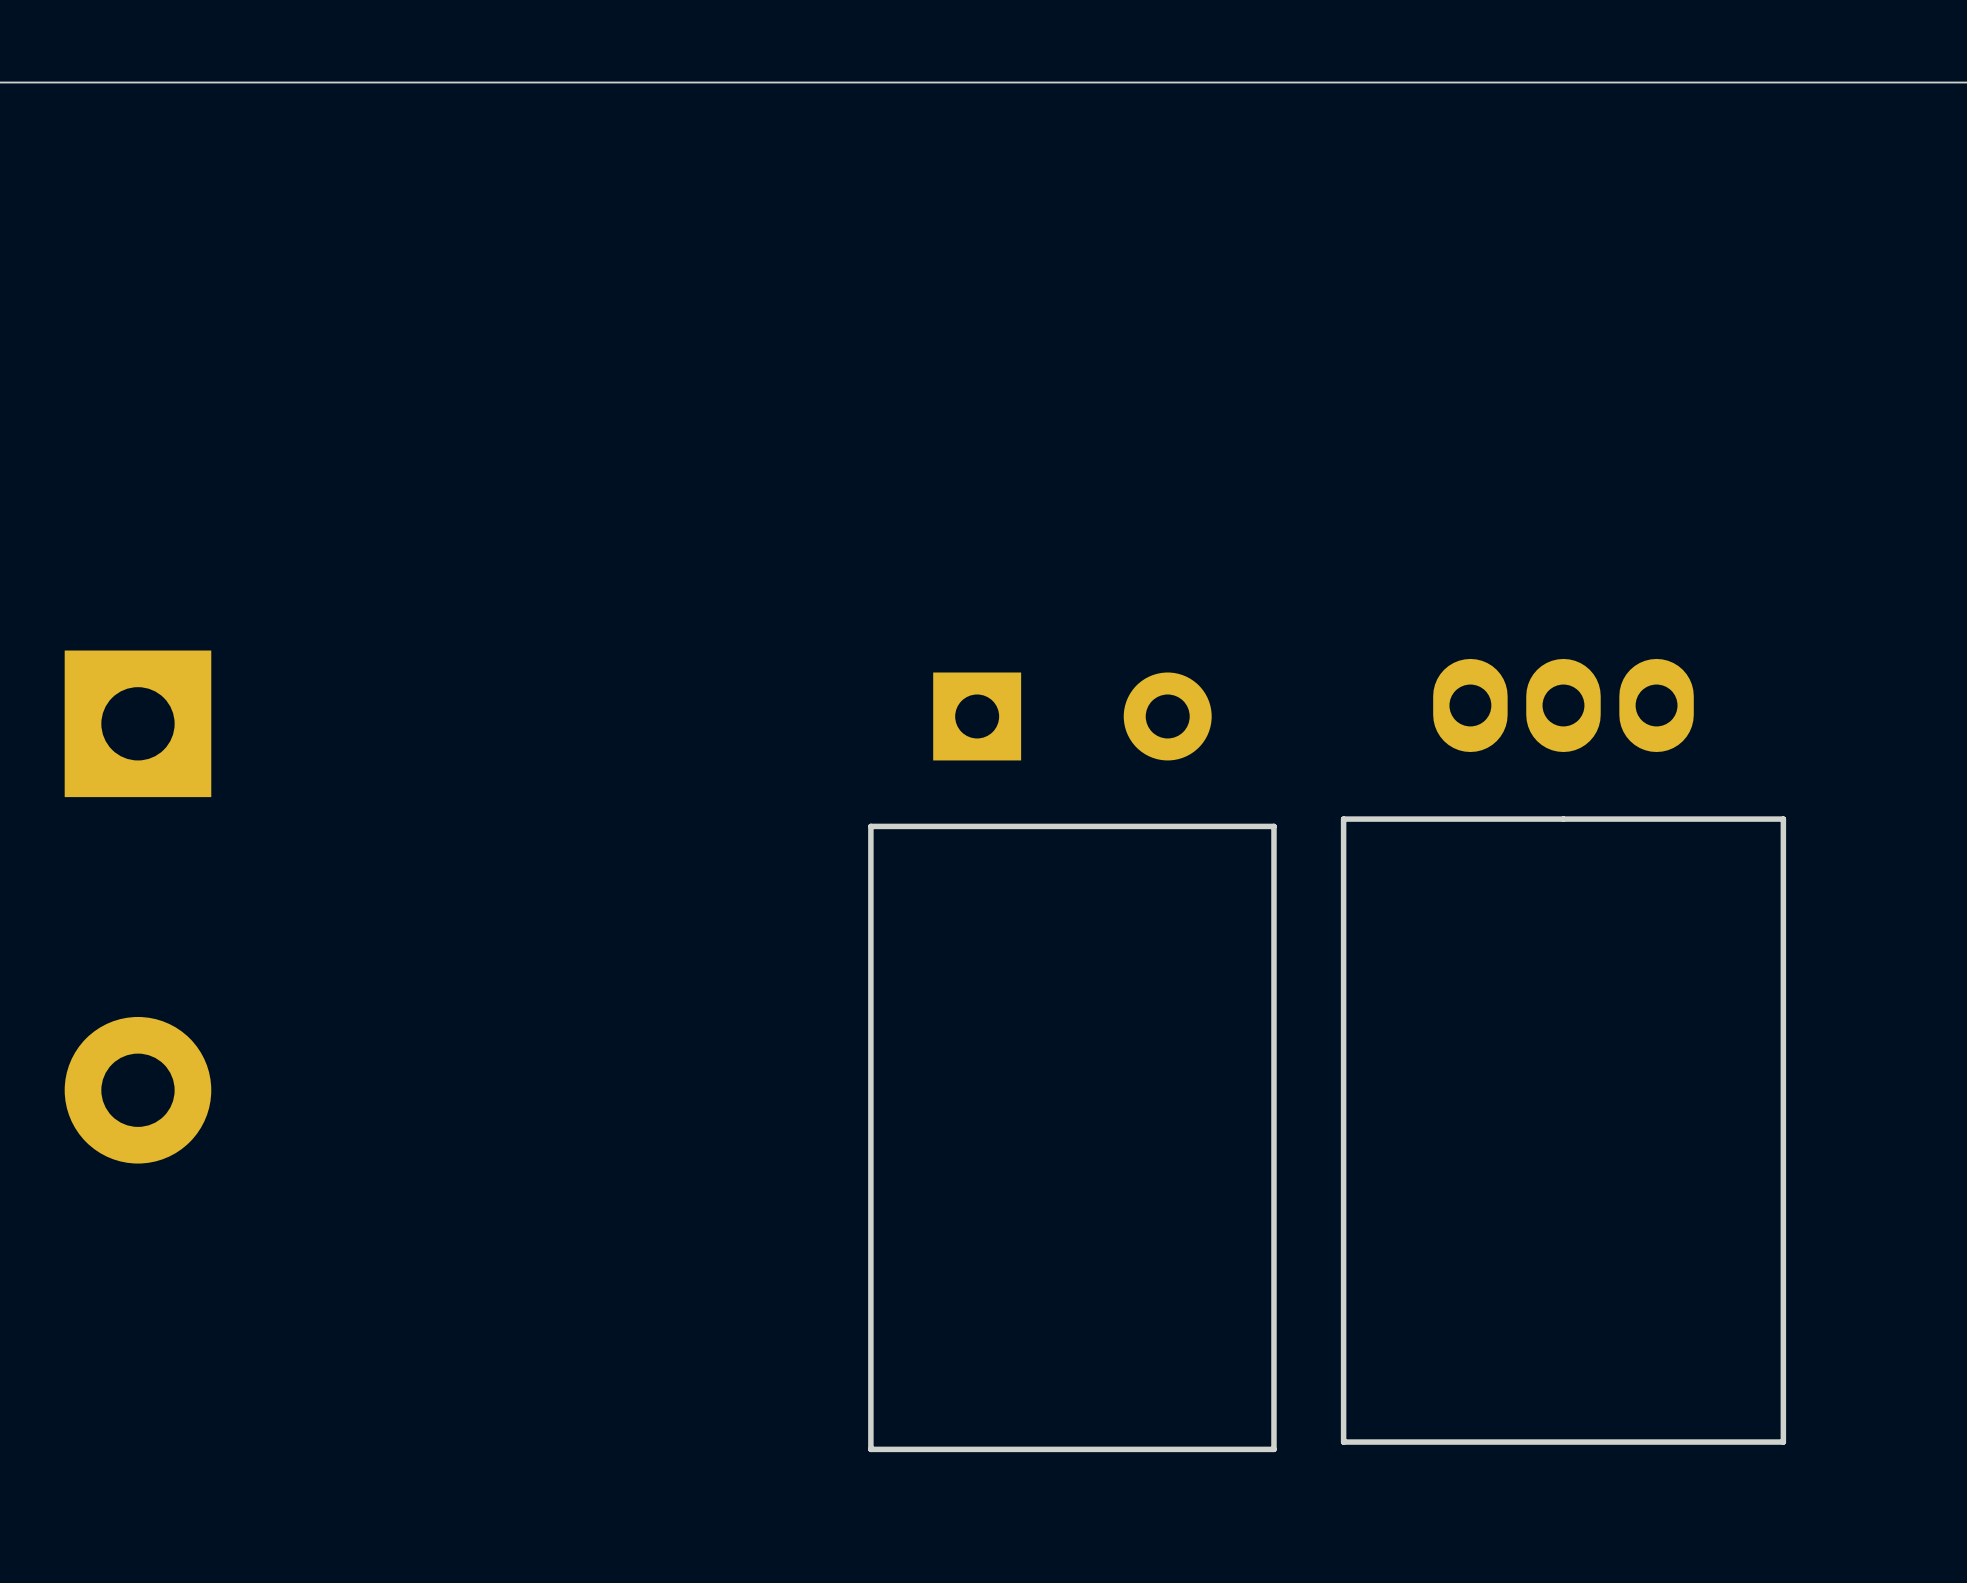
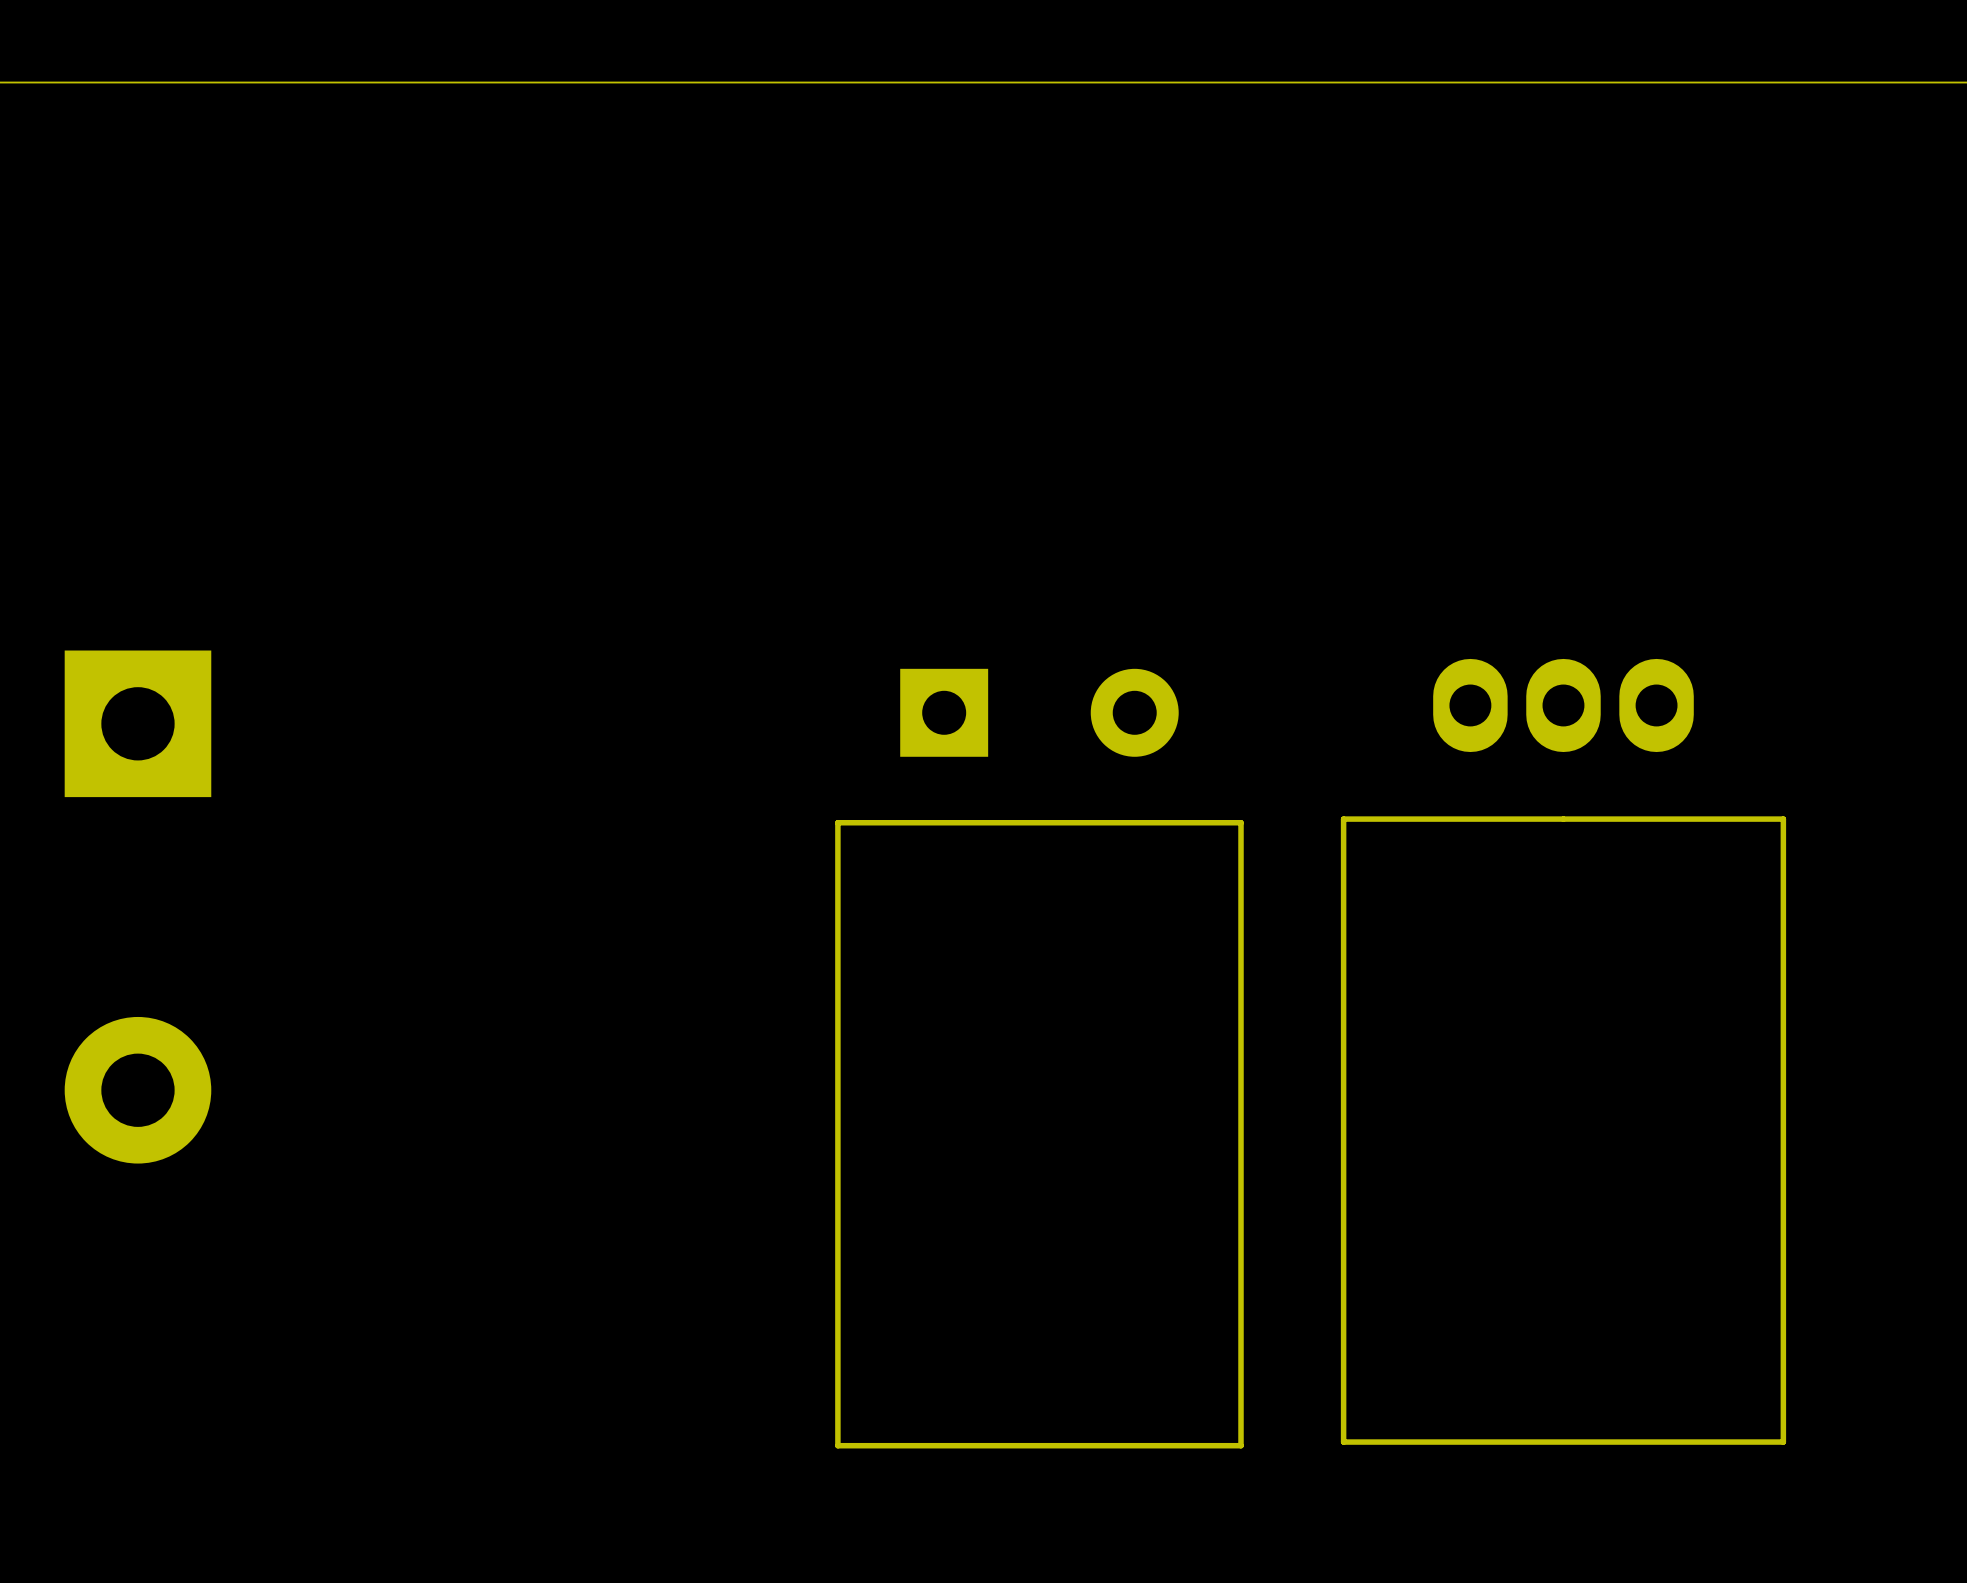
part position: (1072, 1062) -> (1039, 1058)

